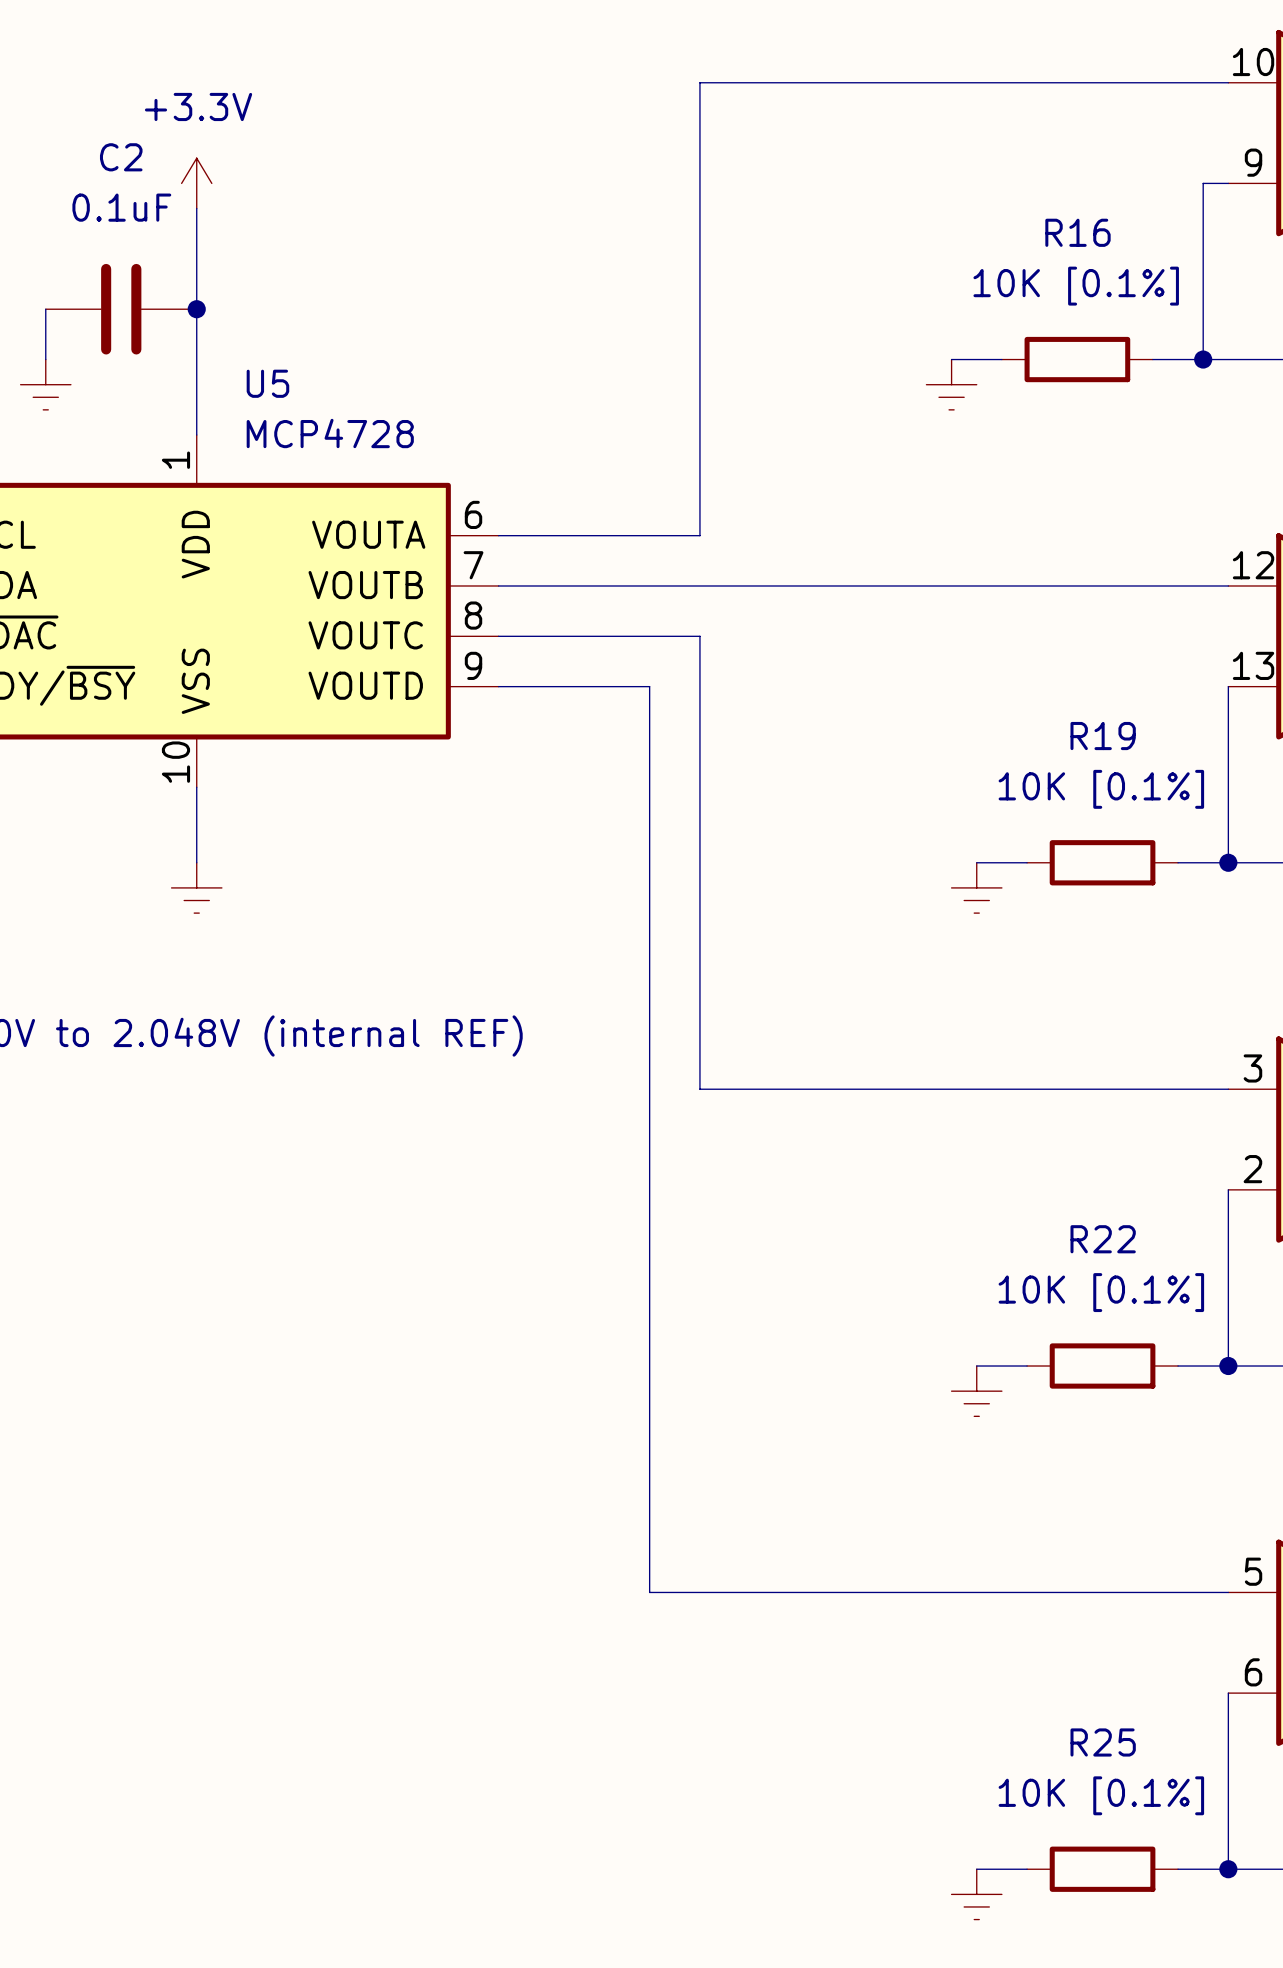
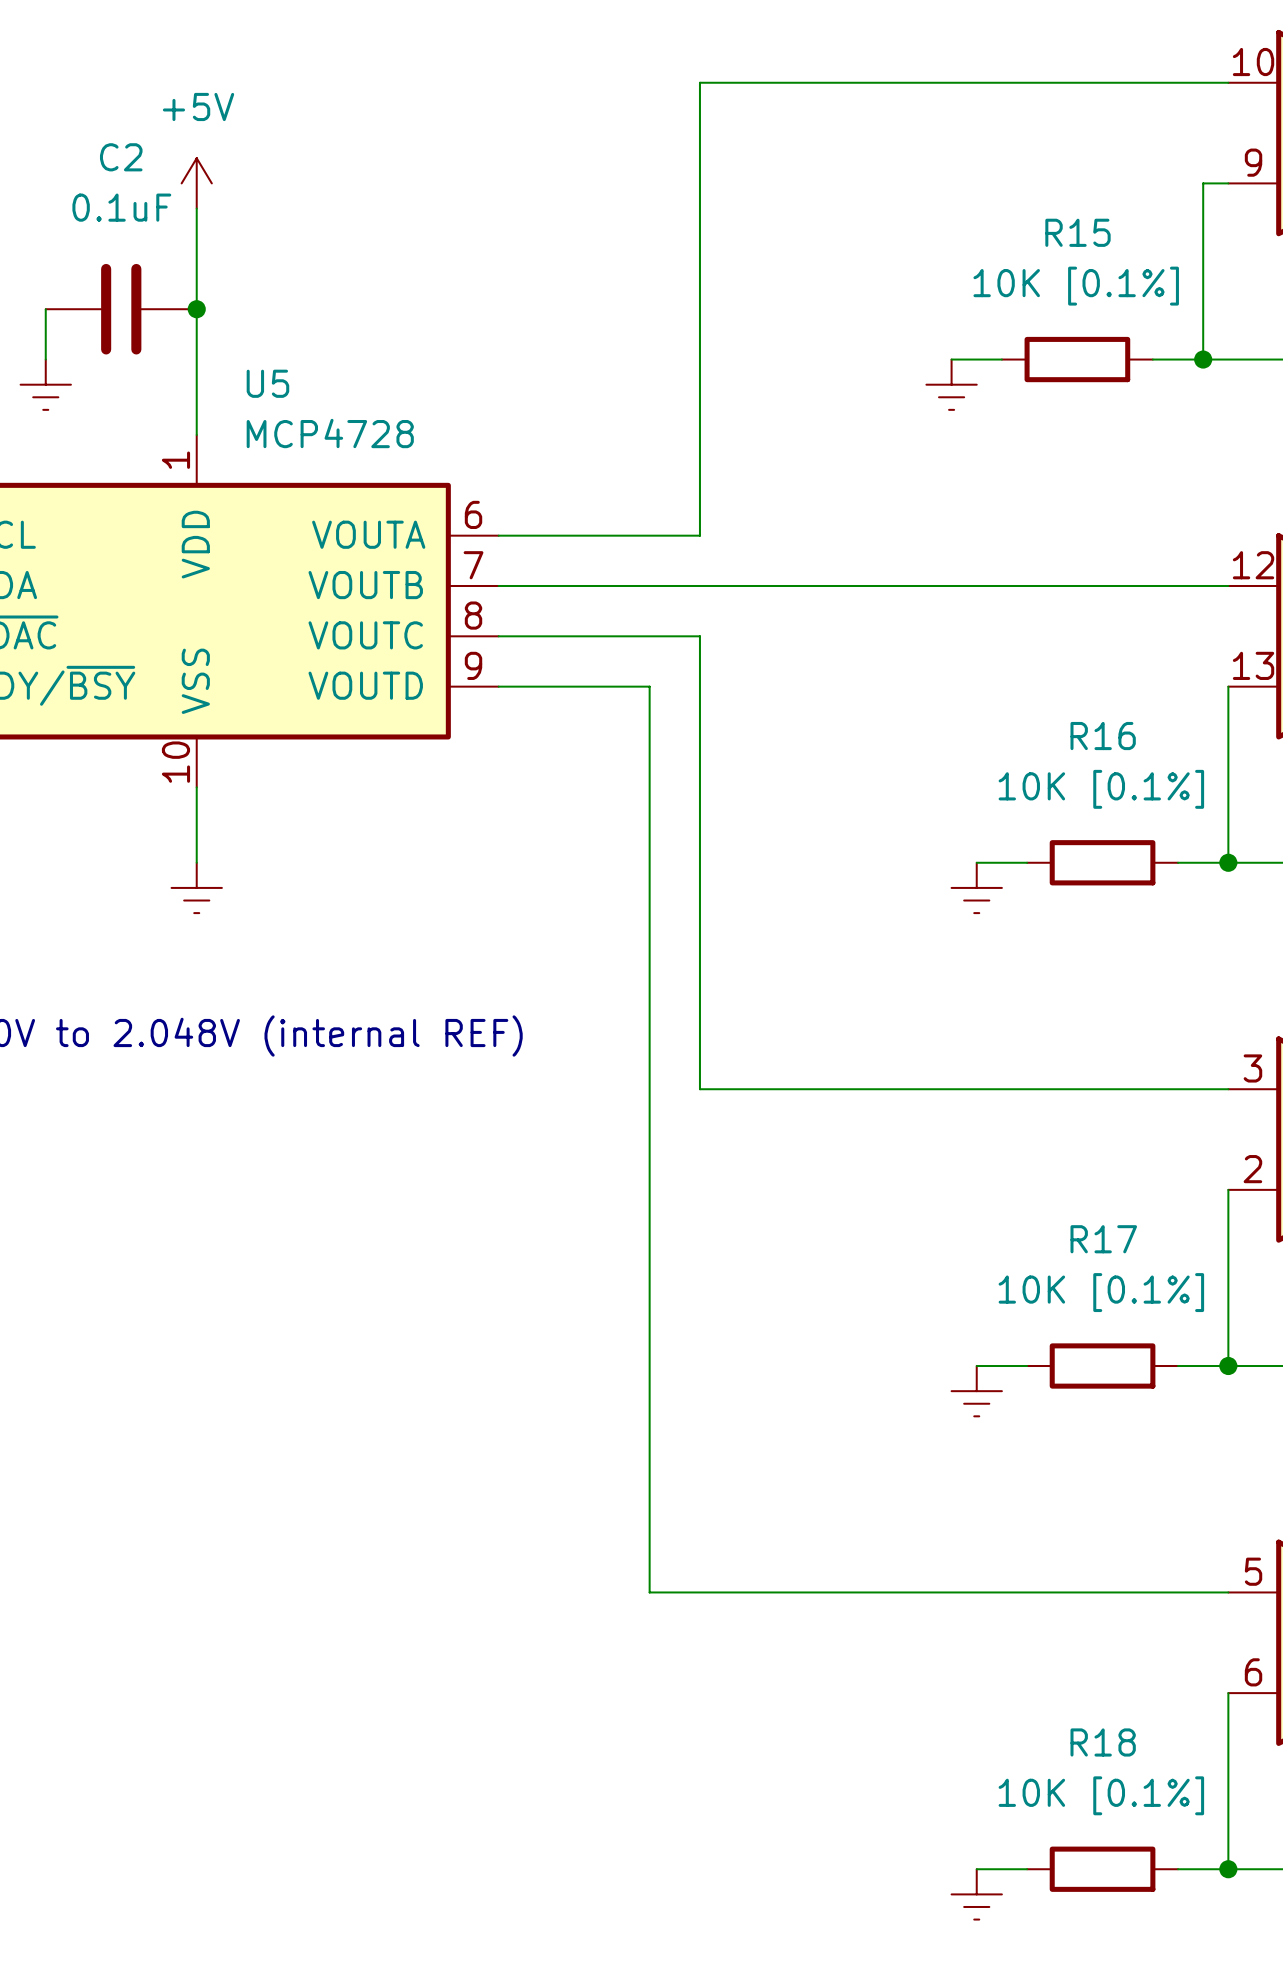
power symbol: +3.3V (196, 183) -> +5V (196, 183)
R16 name: R16 (1077, 232) -> R15 (1077, 232)
R19 name: R19 (1103, 736) -> R16 (1103, 736)
R22 name: R22 (1103, 1239) -> R17 (1103, 1239)
R25 name: R25 (1103, 1742) -> R18 (1103, 1742)

